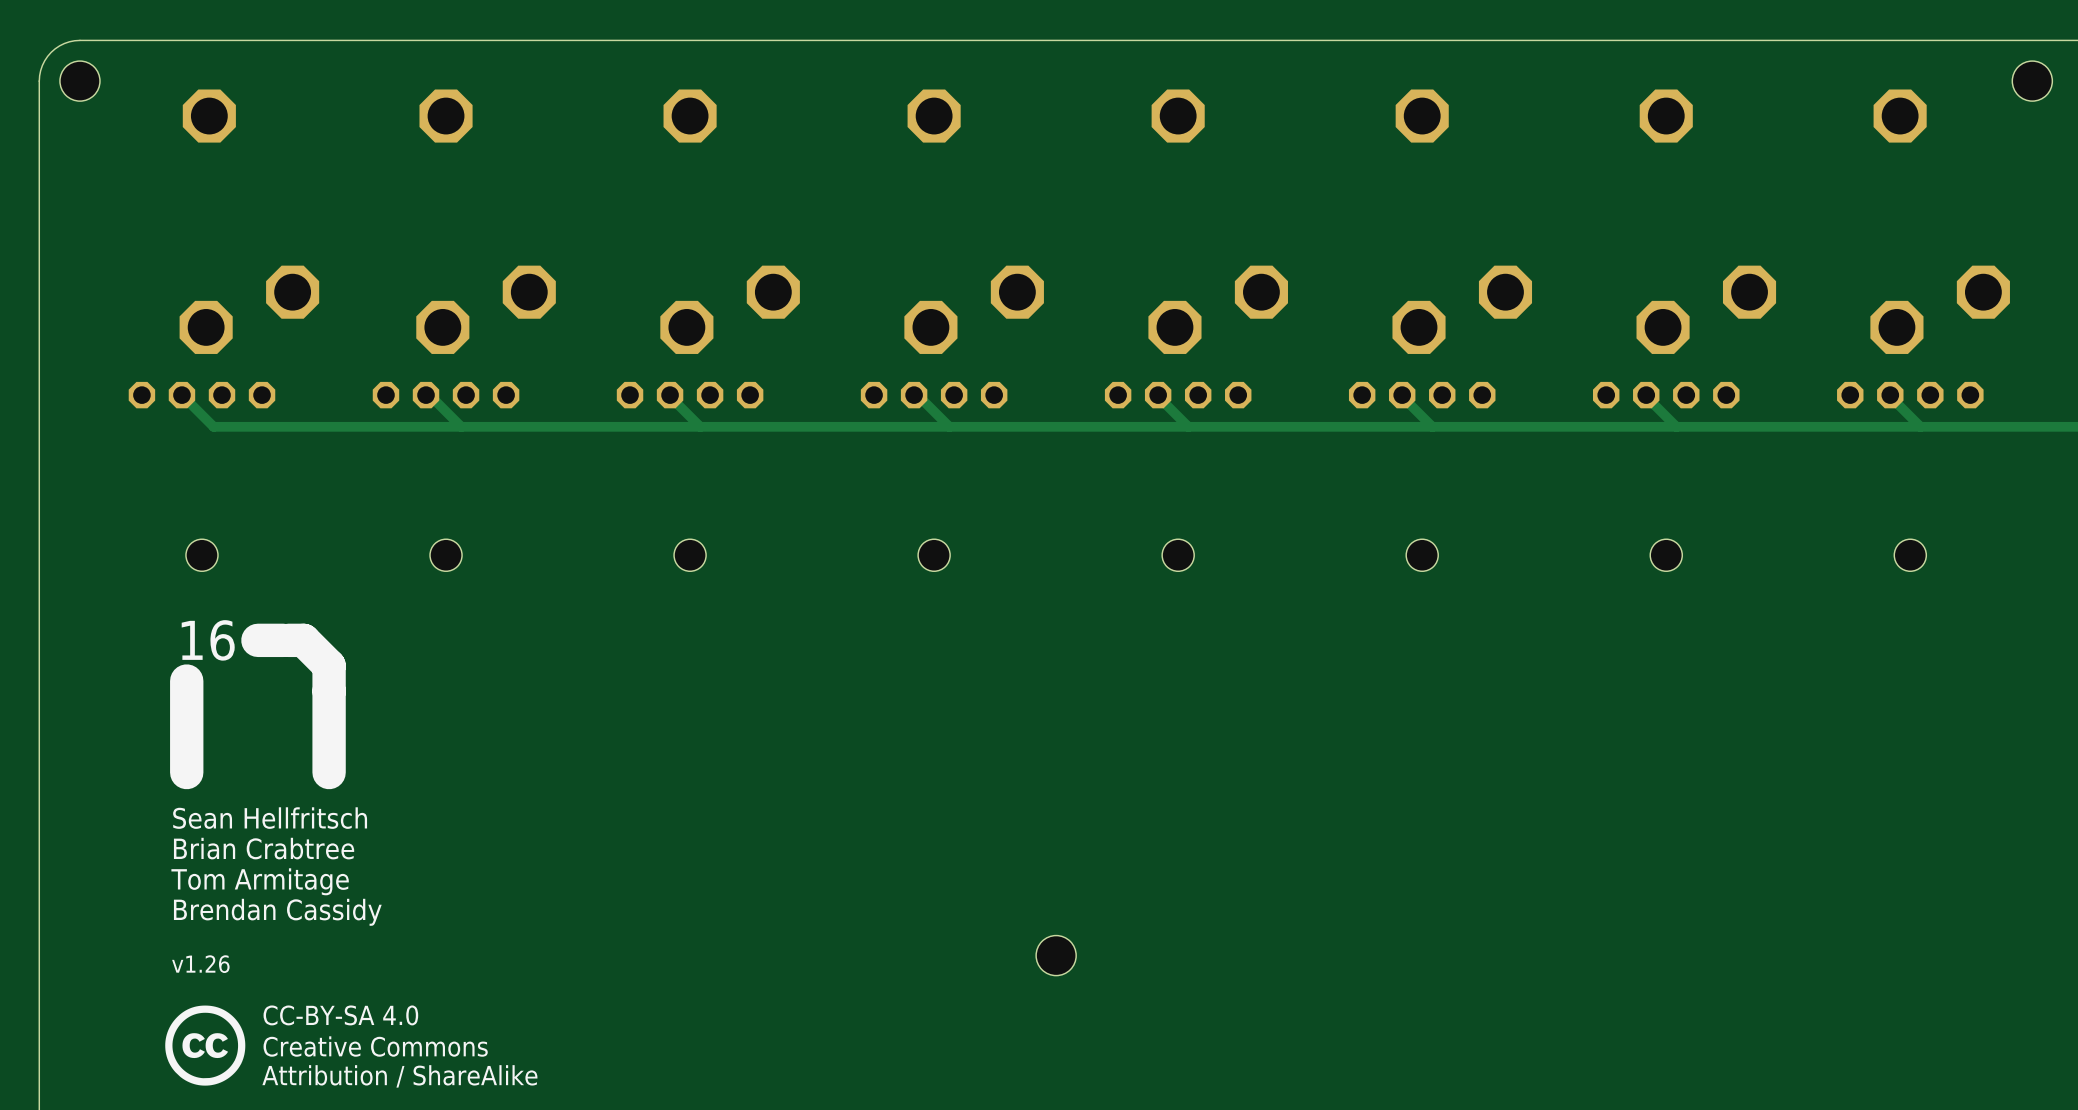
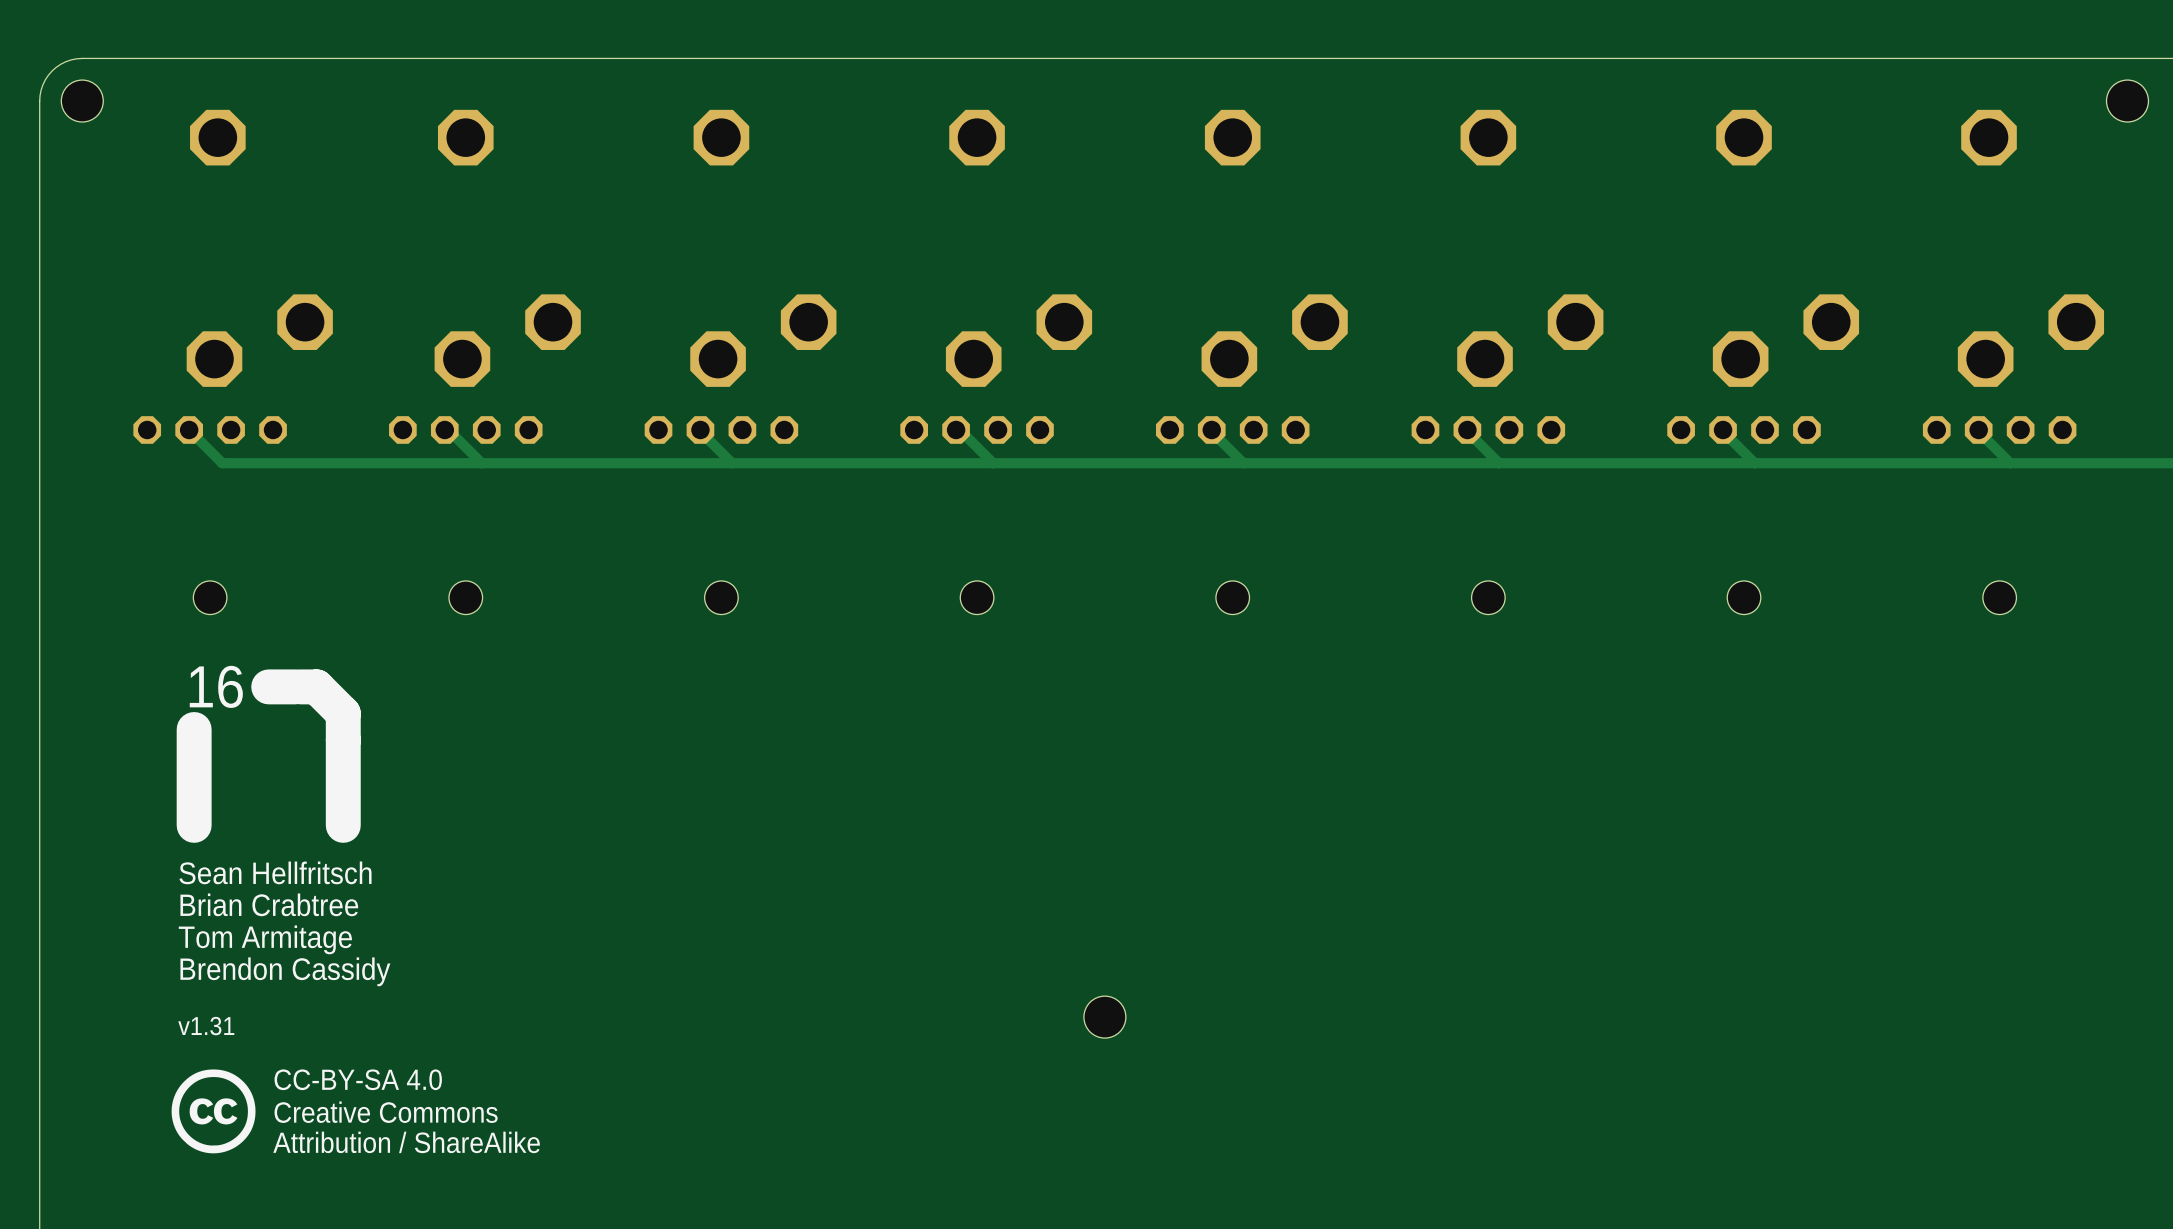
text: Brendan Cassidy (277, 912) -> Brendon Cassidy (285, 971)
text: v1.26 (200, 964) -> v1.31 (206, 1026)

